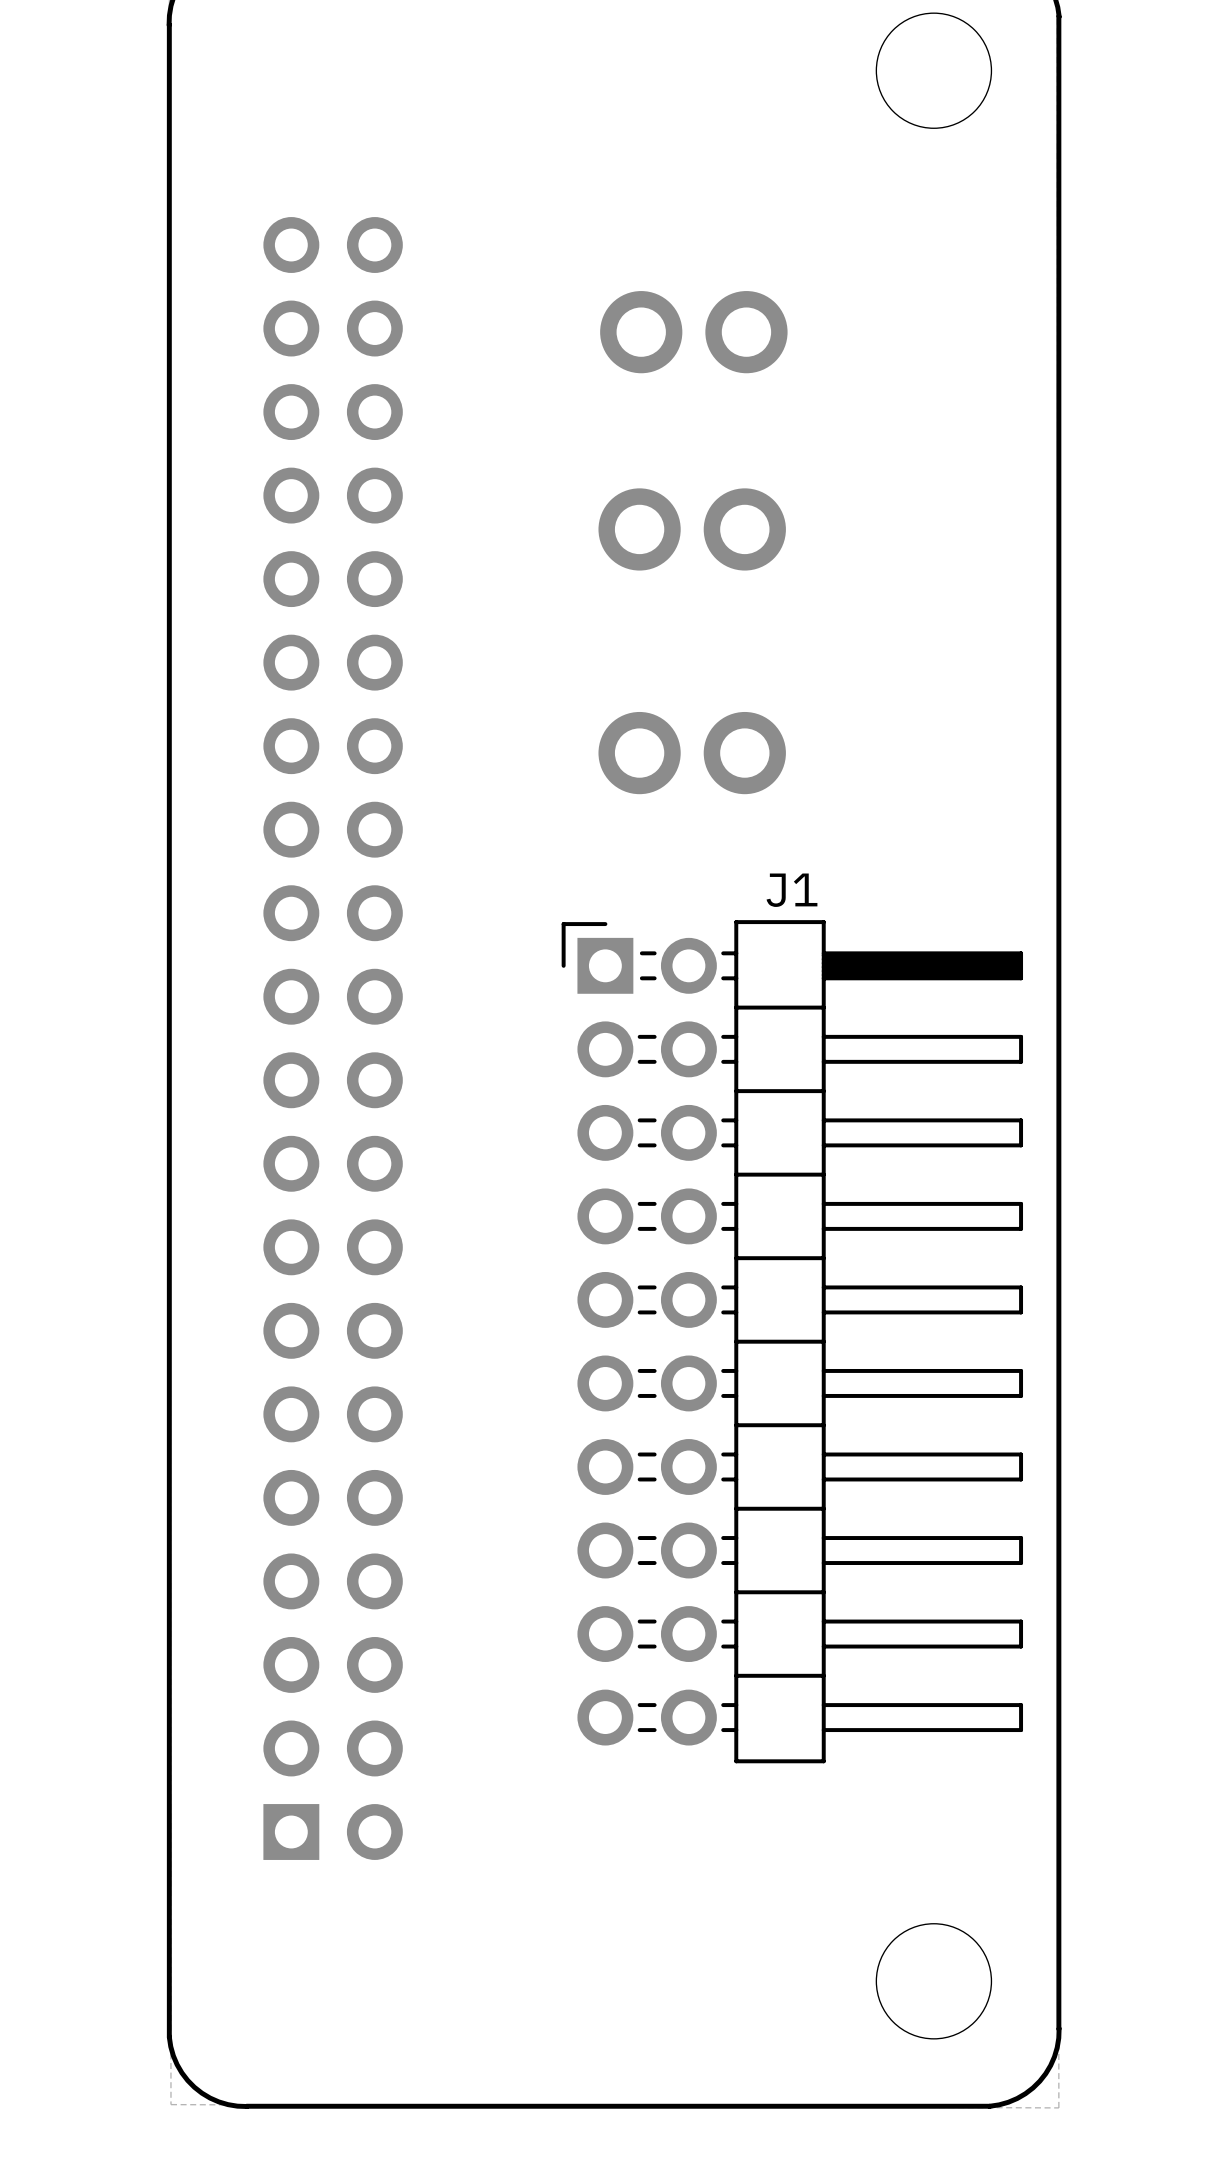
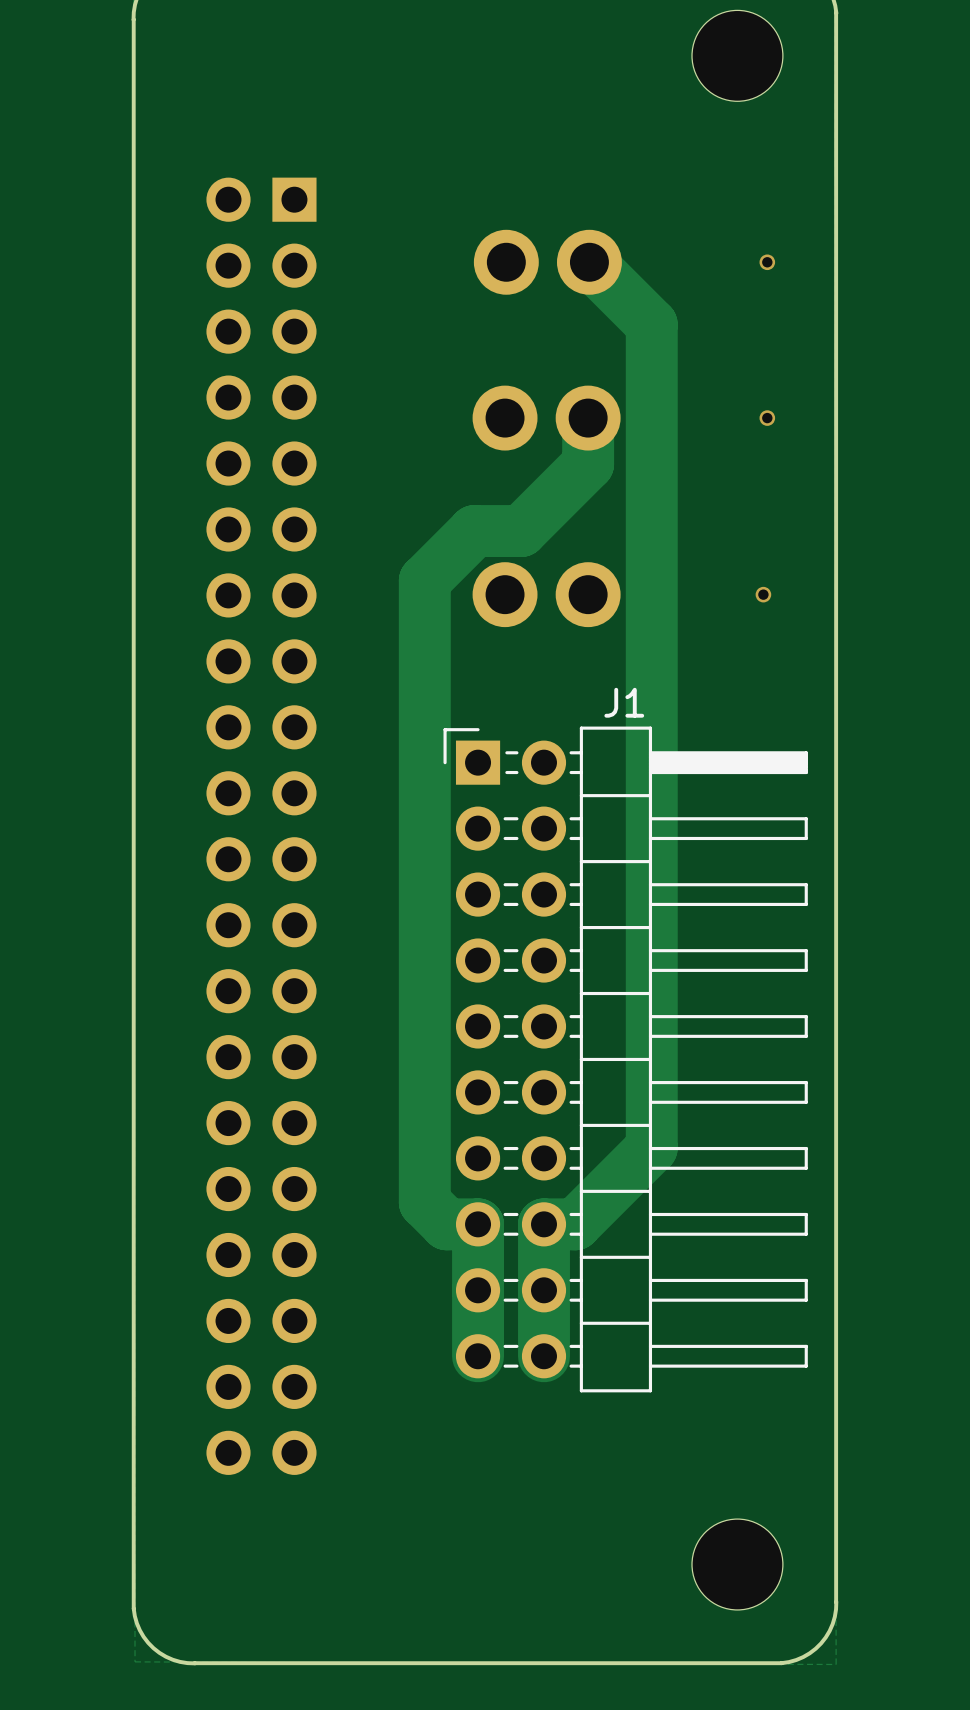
track: none -> (589, 262) (651, 324) (651, 1147) (575, 1224) (544, 1224) (544, 1356)
via: none -> (767, 262)
track: none -> (588, 418) (588, 463) (521, 531) (474, 531) (424, 580) (424, 1202) (446, 1224) (478, 1224) (478, 1356)
via: none -> (767, 418)
via: none -> (763, 594)
part rotation: 0° (333, 1038) -> 180° (261, 826)

